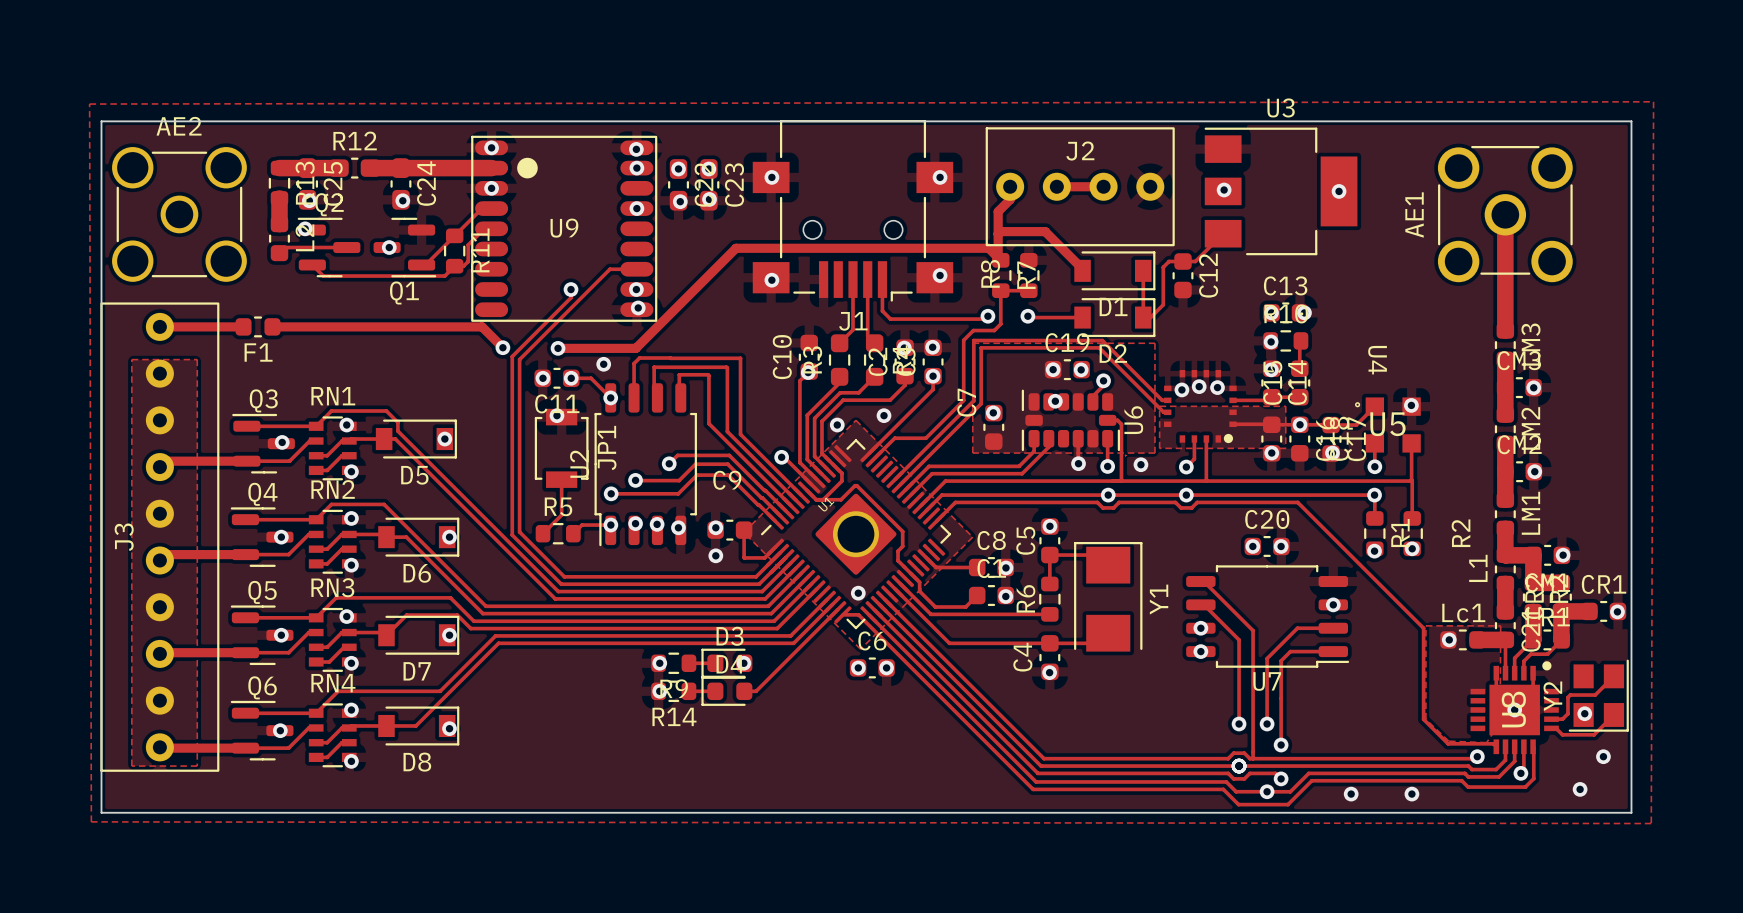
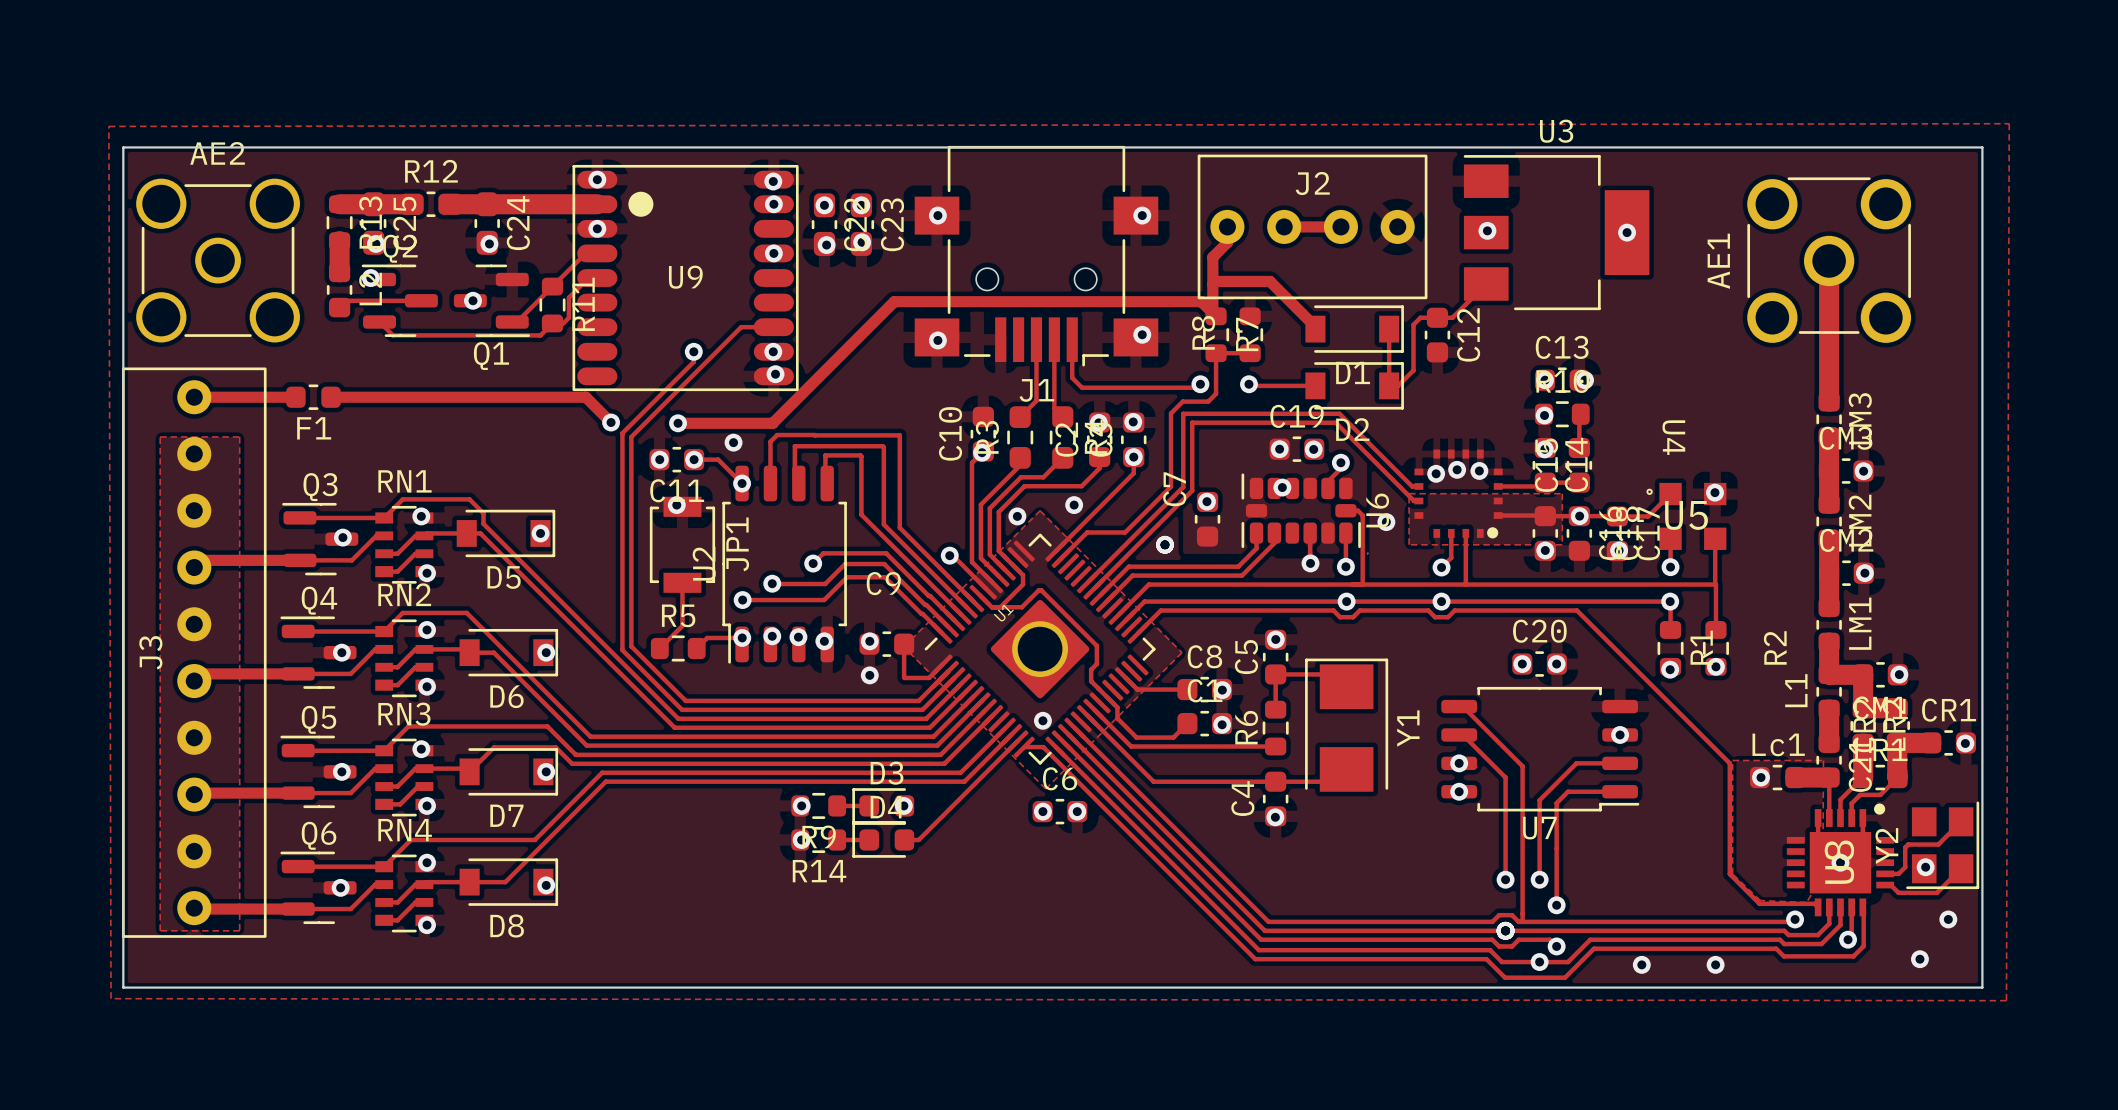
zone outline: (972, 343) (972, 453) (1154, 453) (1154, 343) (972, 343) -> none
via: none -> (1164, 544)
via position: (1140, 464) -> (1386, 522)

